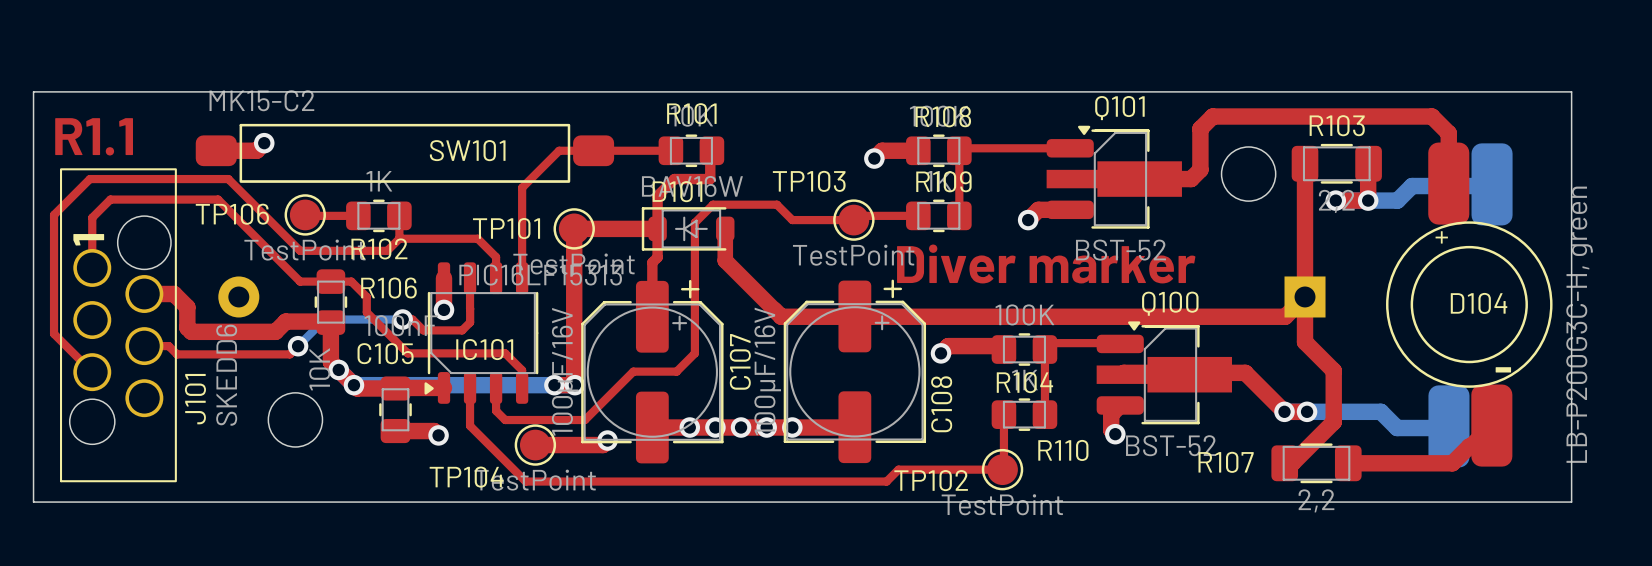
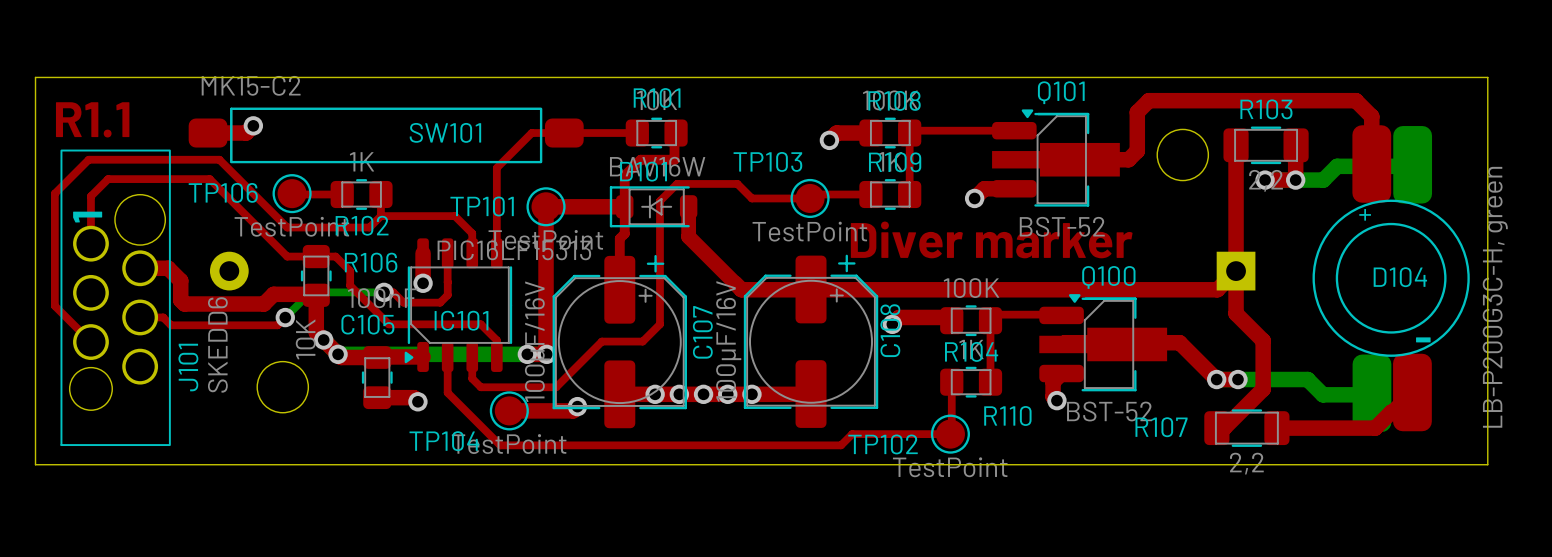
C108 name position: C108 (941, 404) -> C108 (890, 330)

